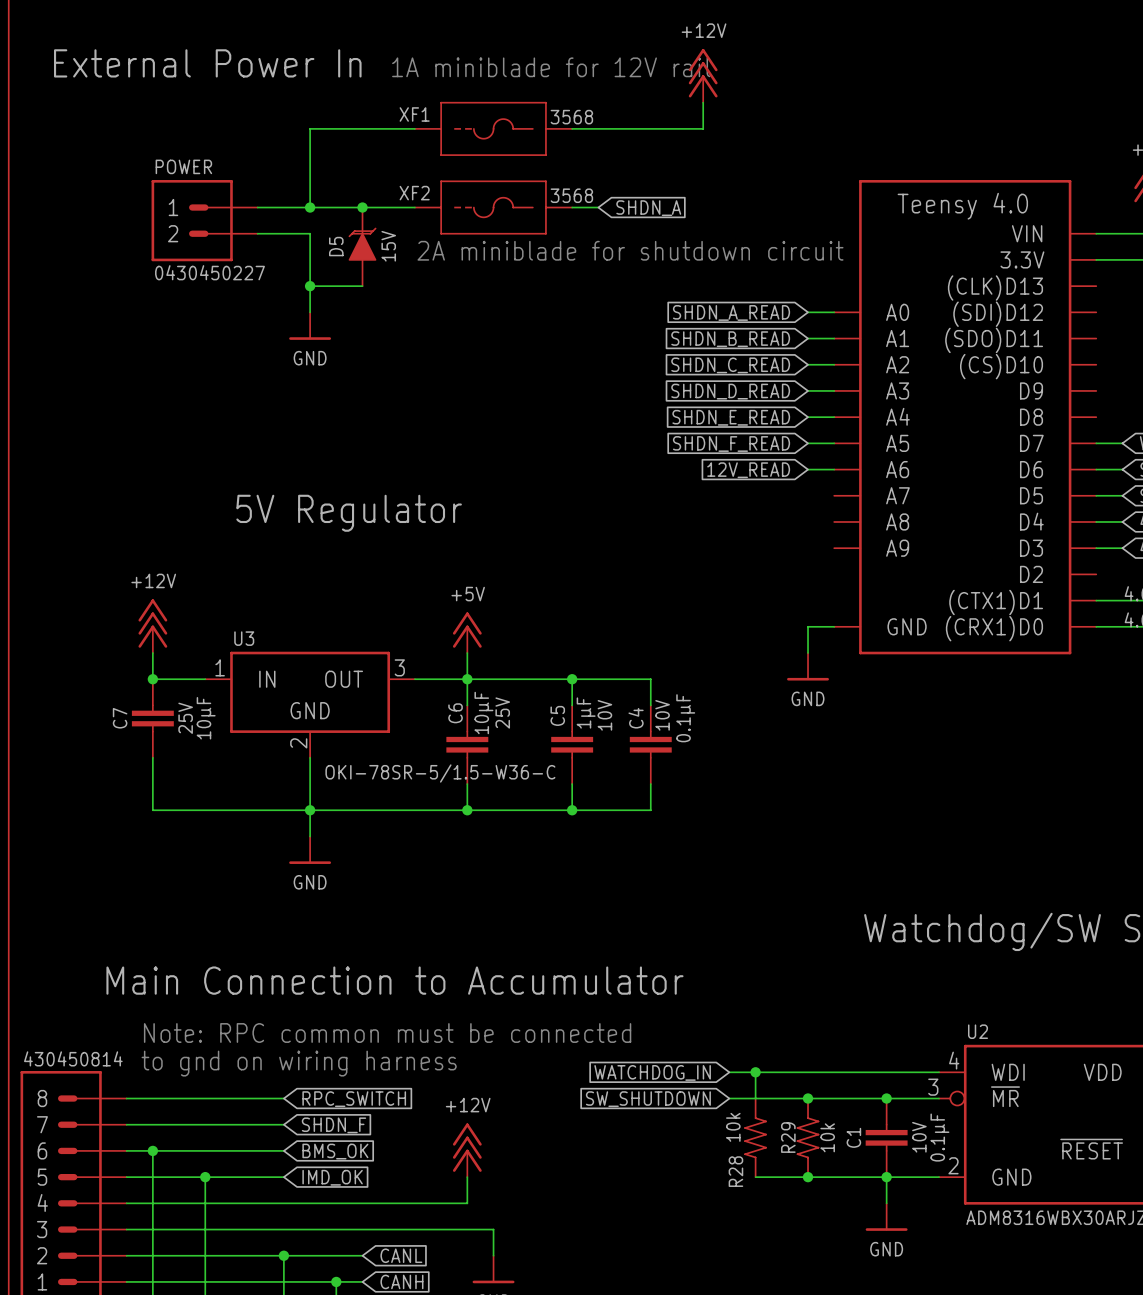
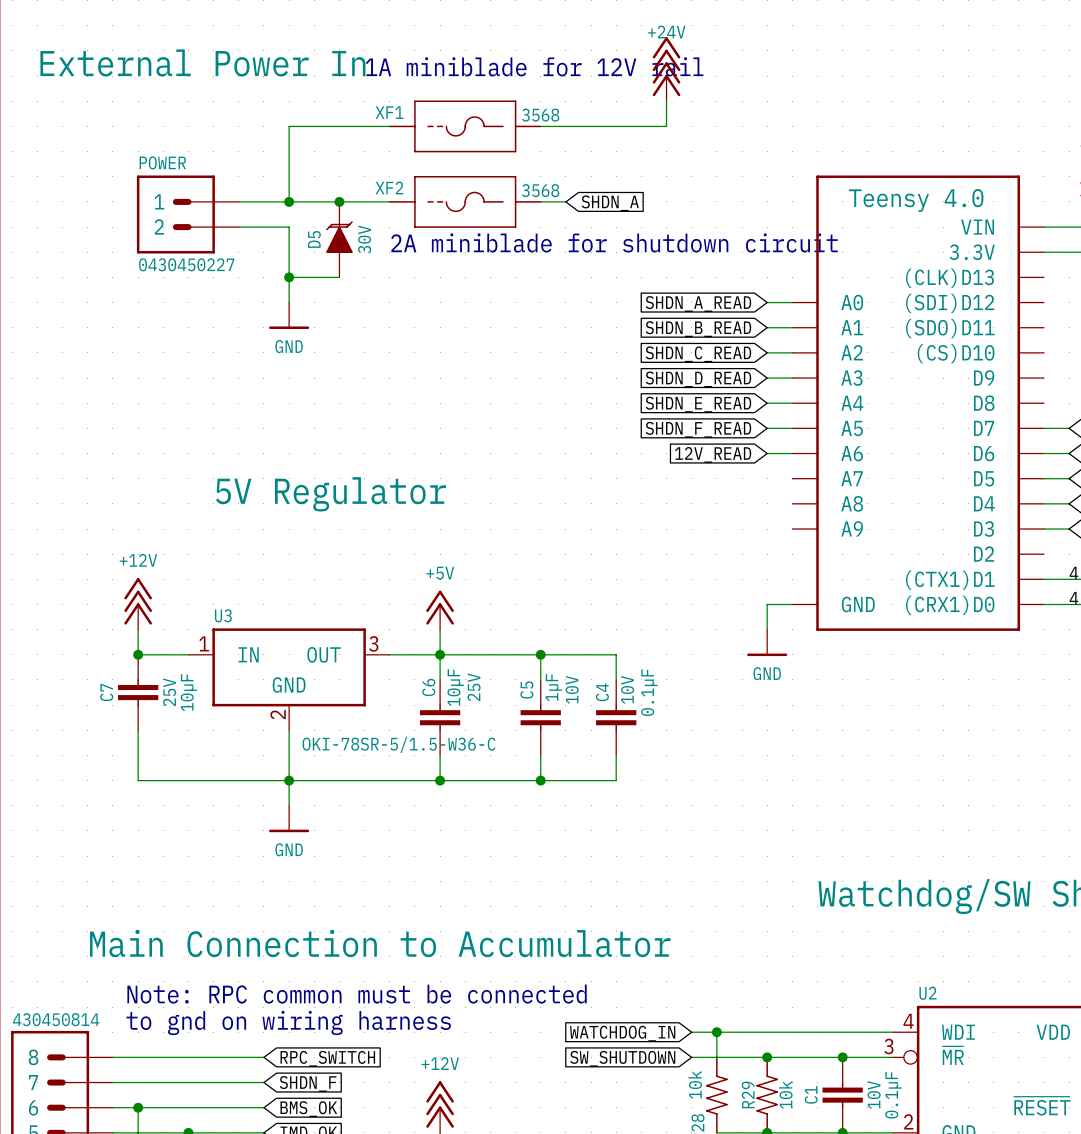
power symbol: +12V (703, 75) -> +24V (666, 69)
D5 text: 15V (388, 246) -> 30V (364, 239)

